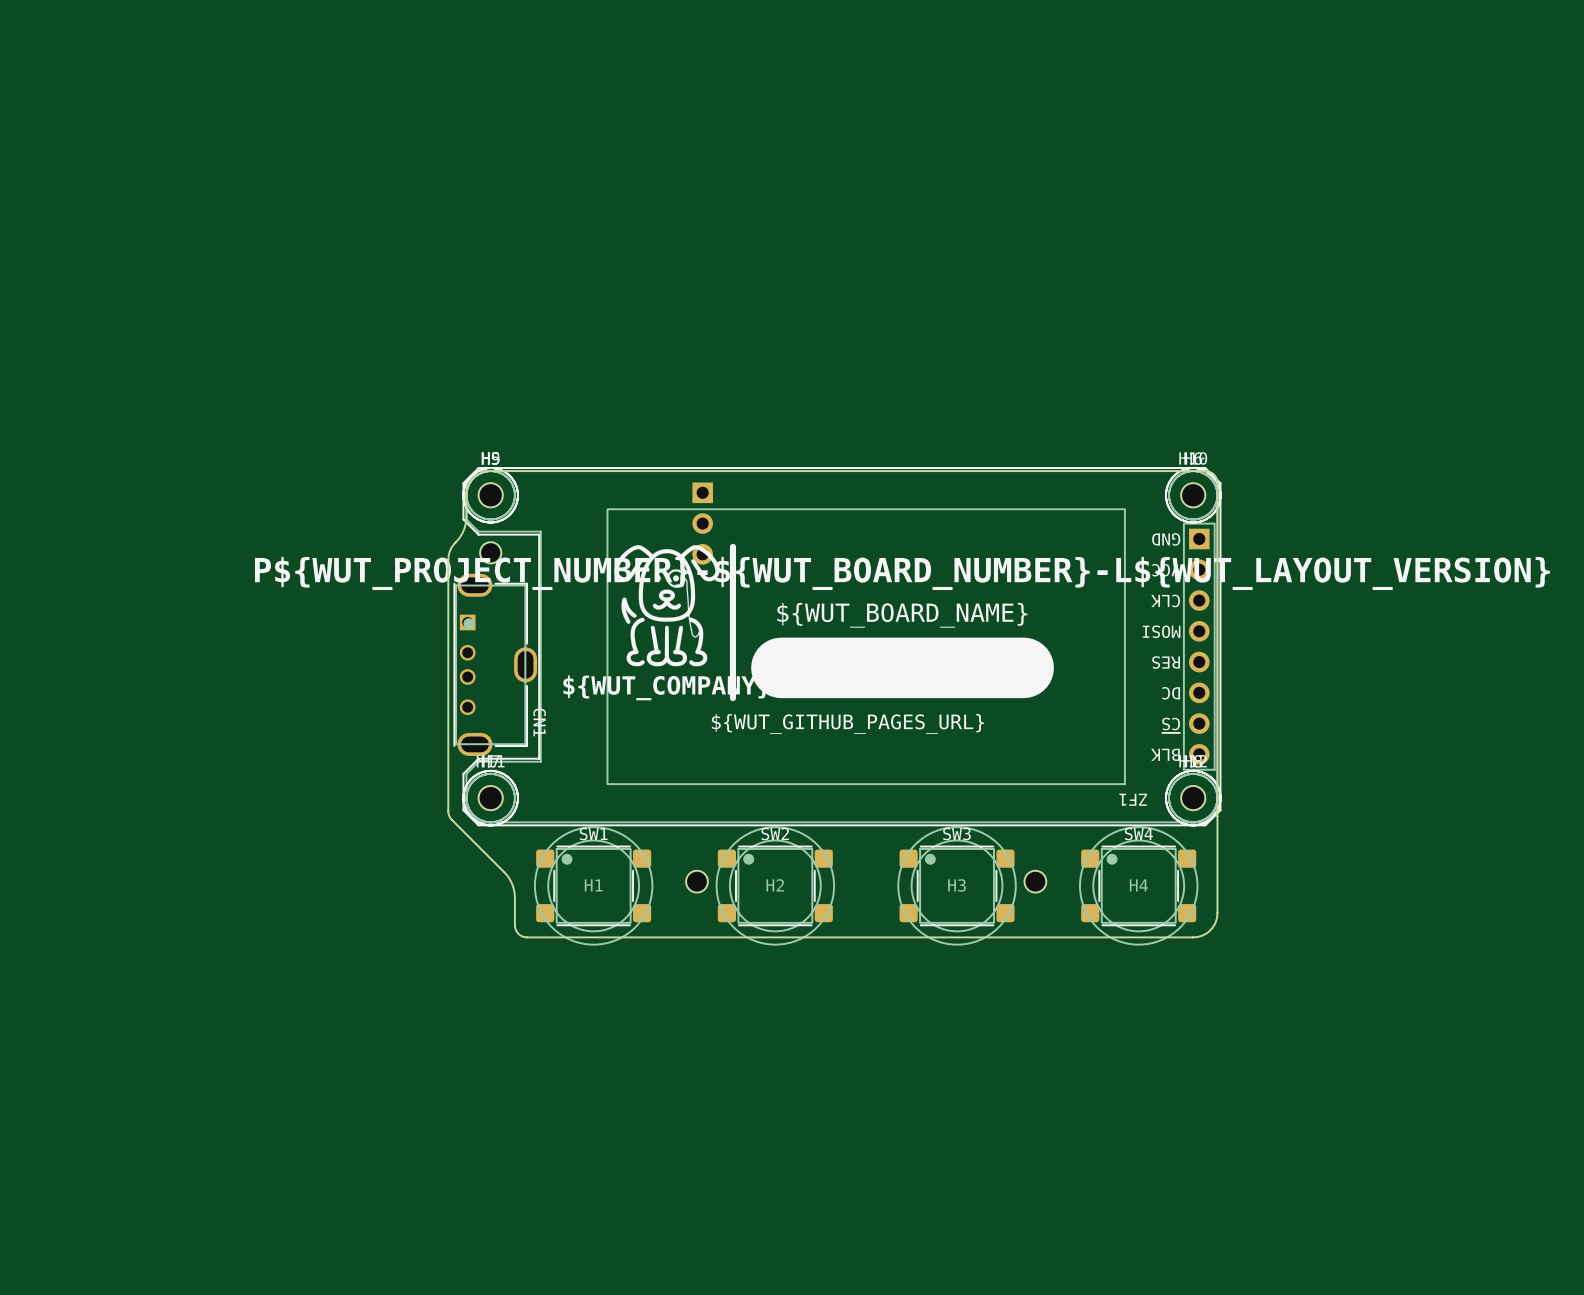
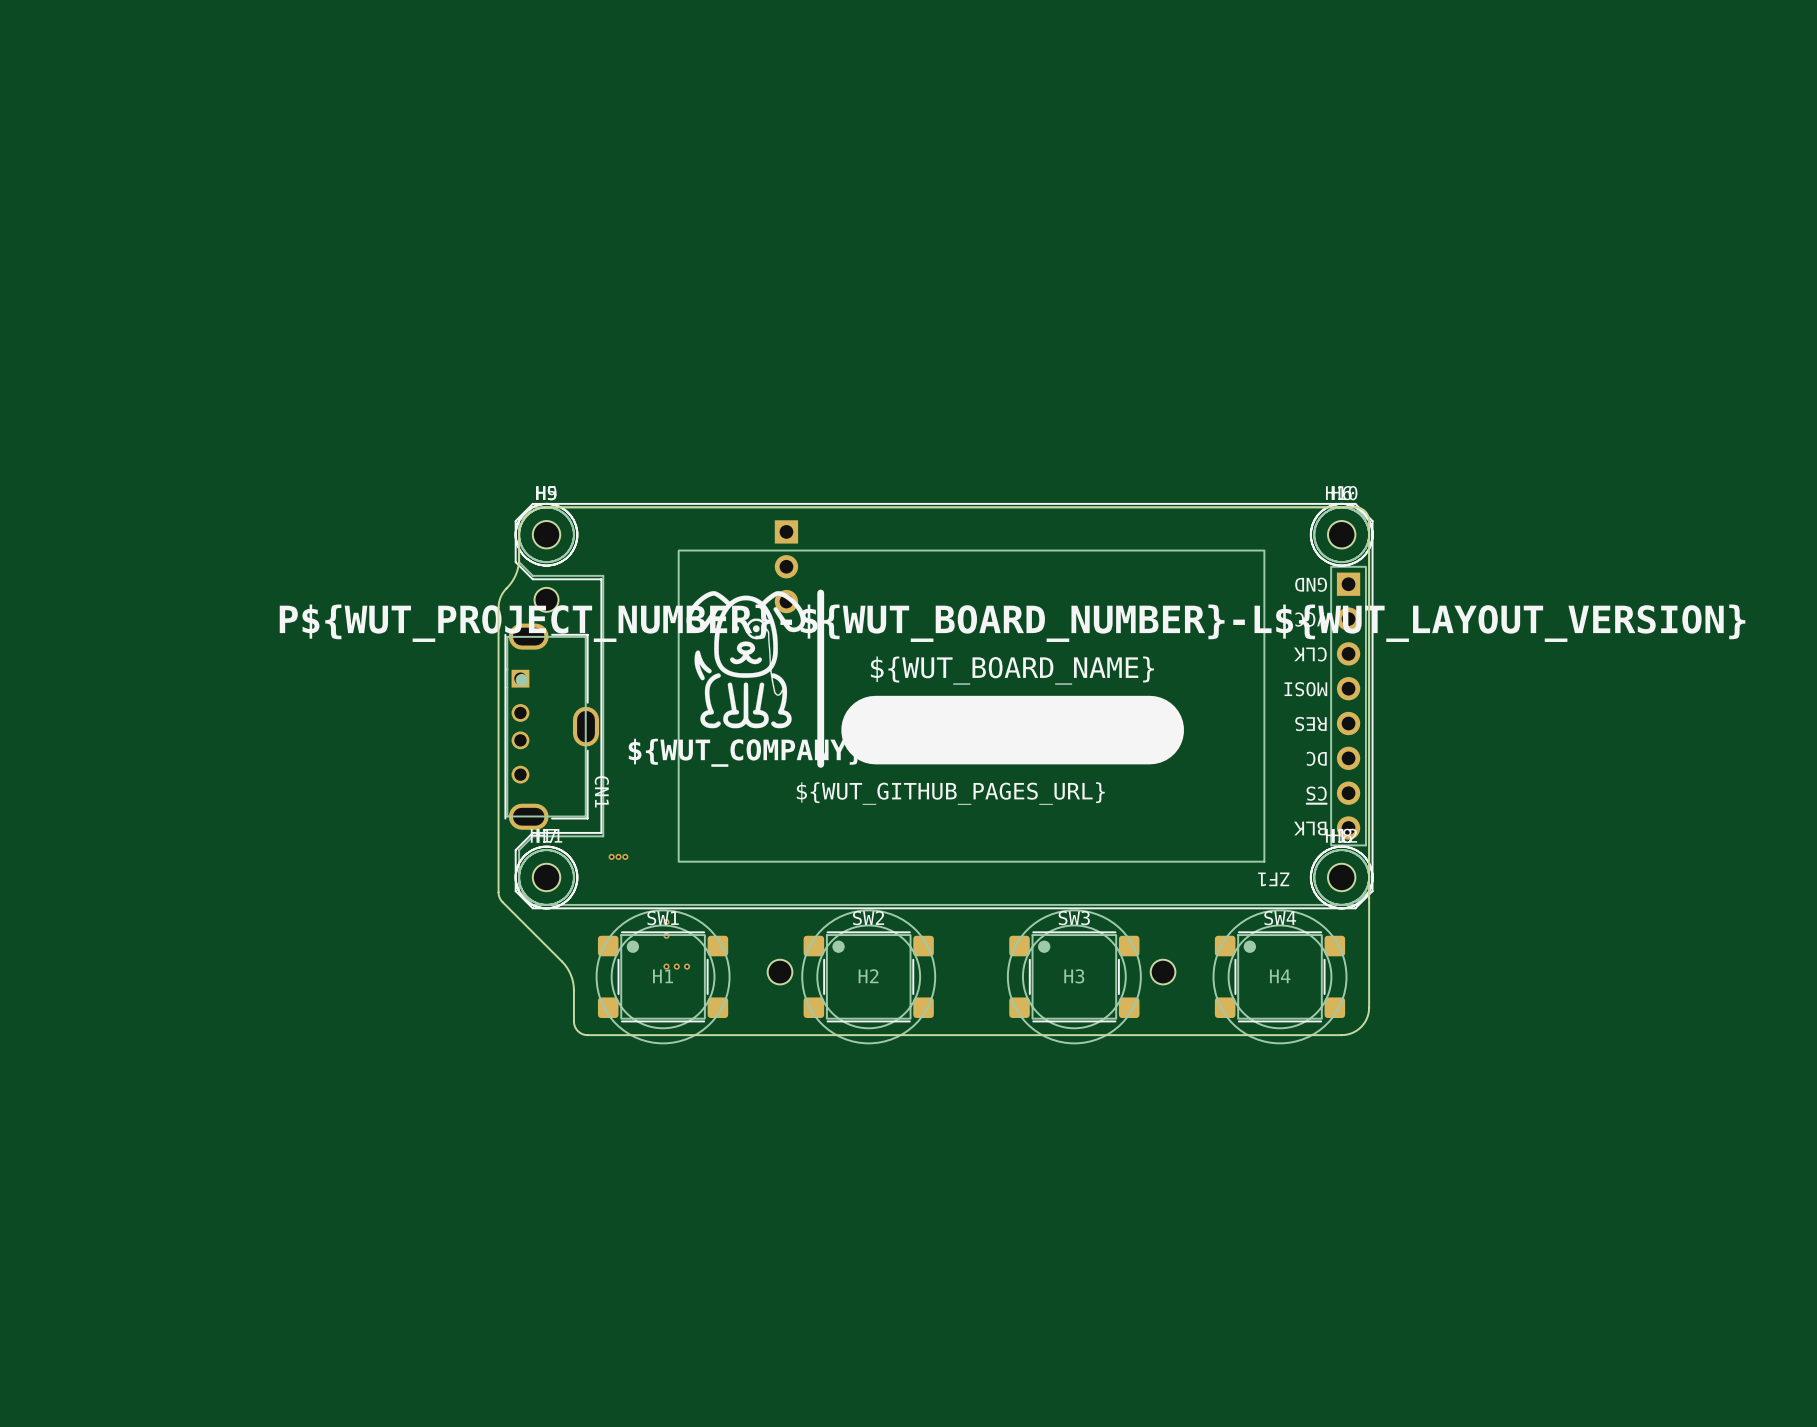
via: none -> (611, 856)
via: none -> (618, 856)
via: none -> (625, 856)
via: none -> (666, 922)
via: none -> (666, 935)
via: none -> (666, 966)
via: none -> (676, 966)
via: none -> (687, 966)

